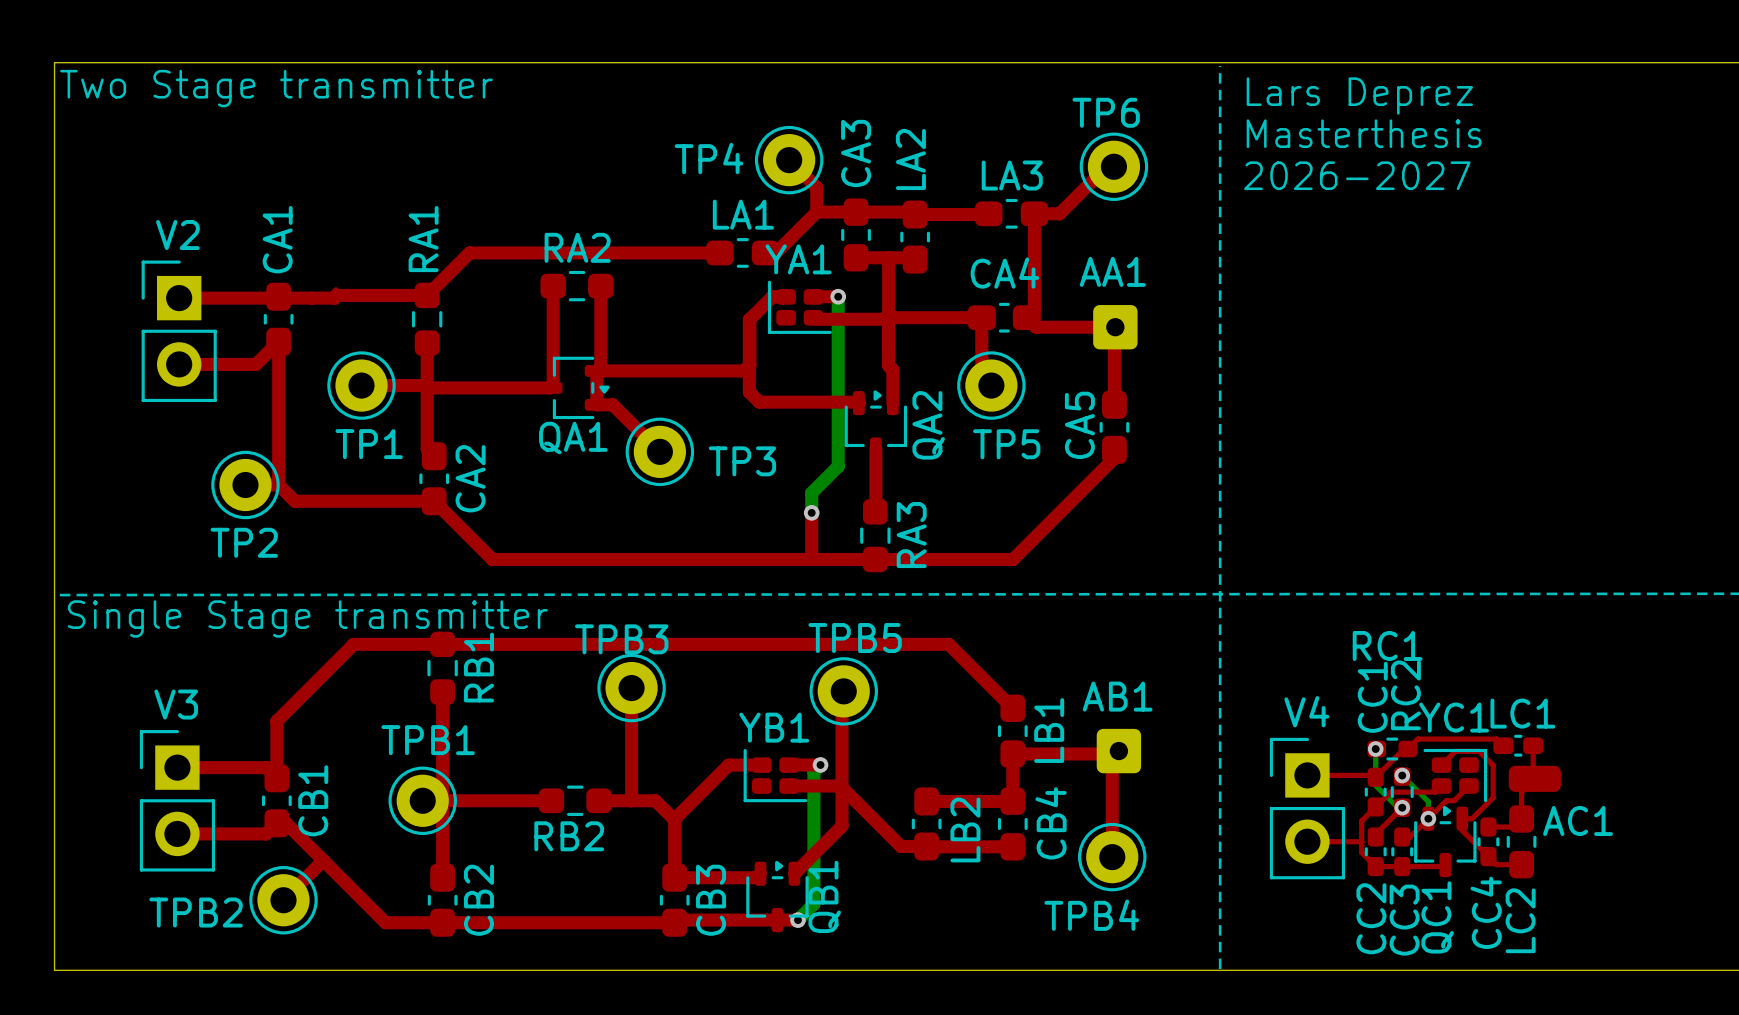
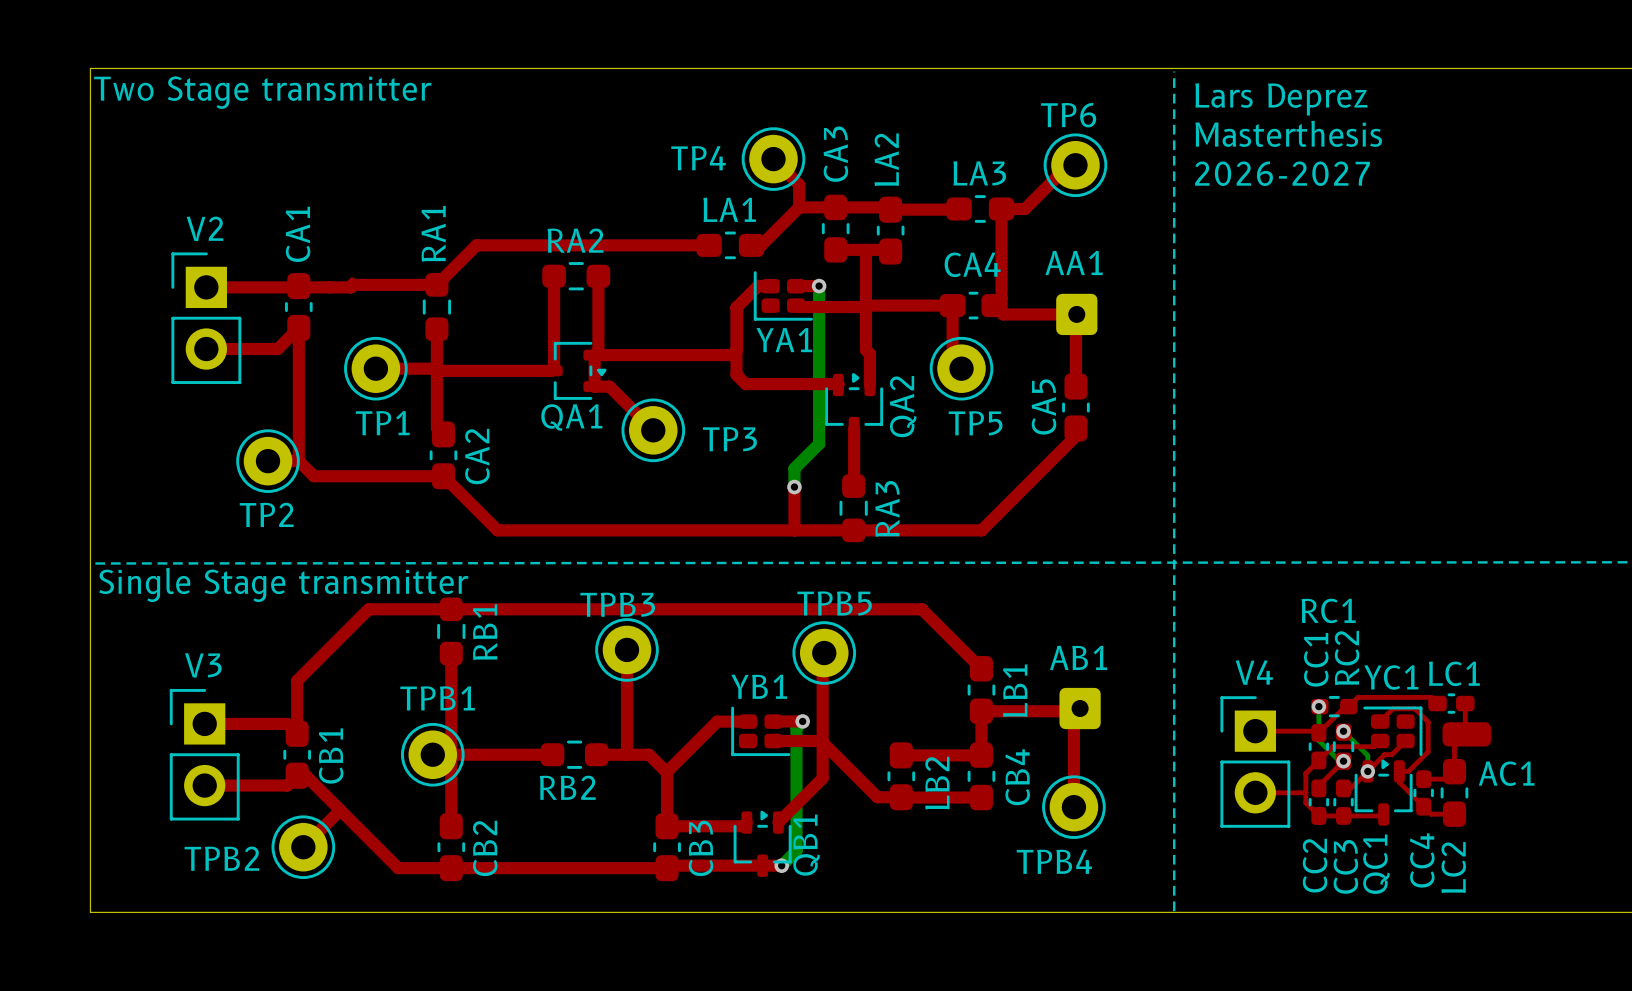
YA1 name position: YA1 (798, 259) -> YA1 (784, 340)

